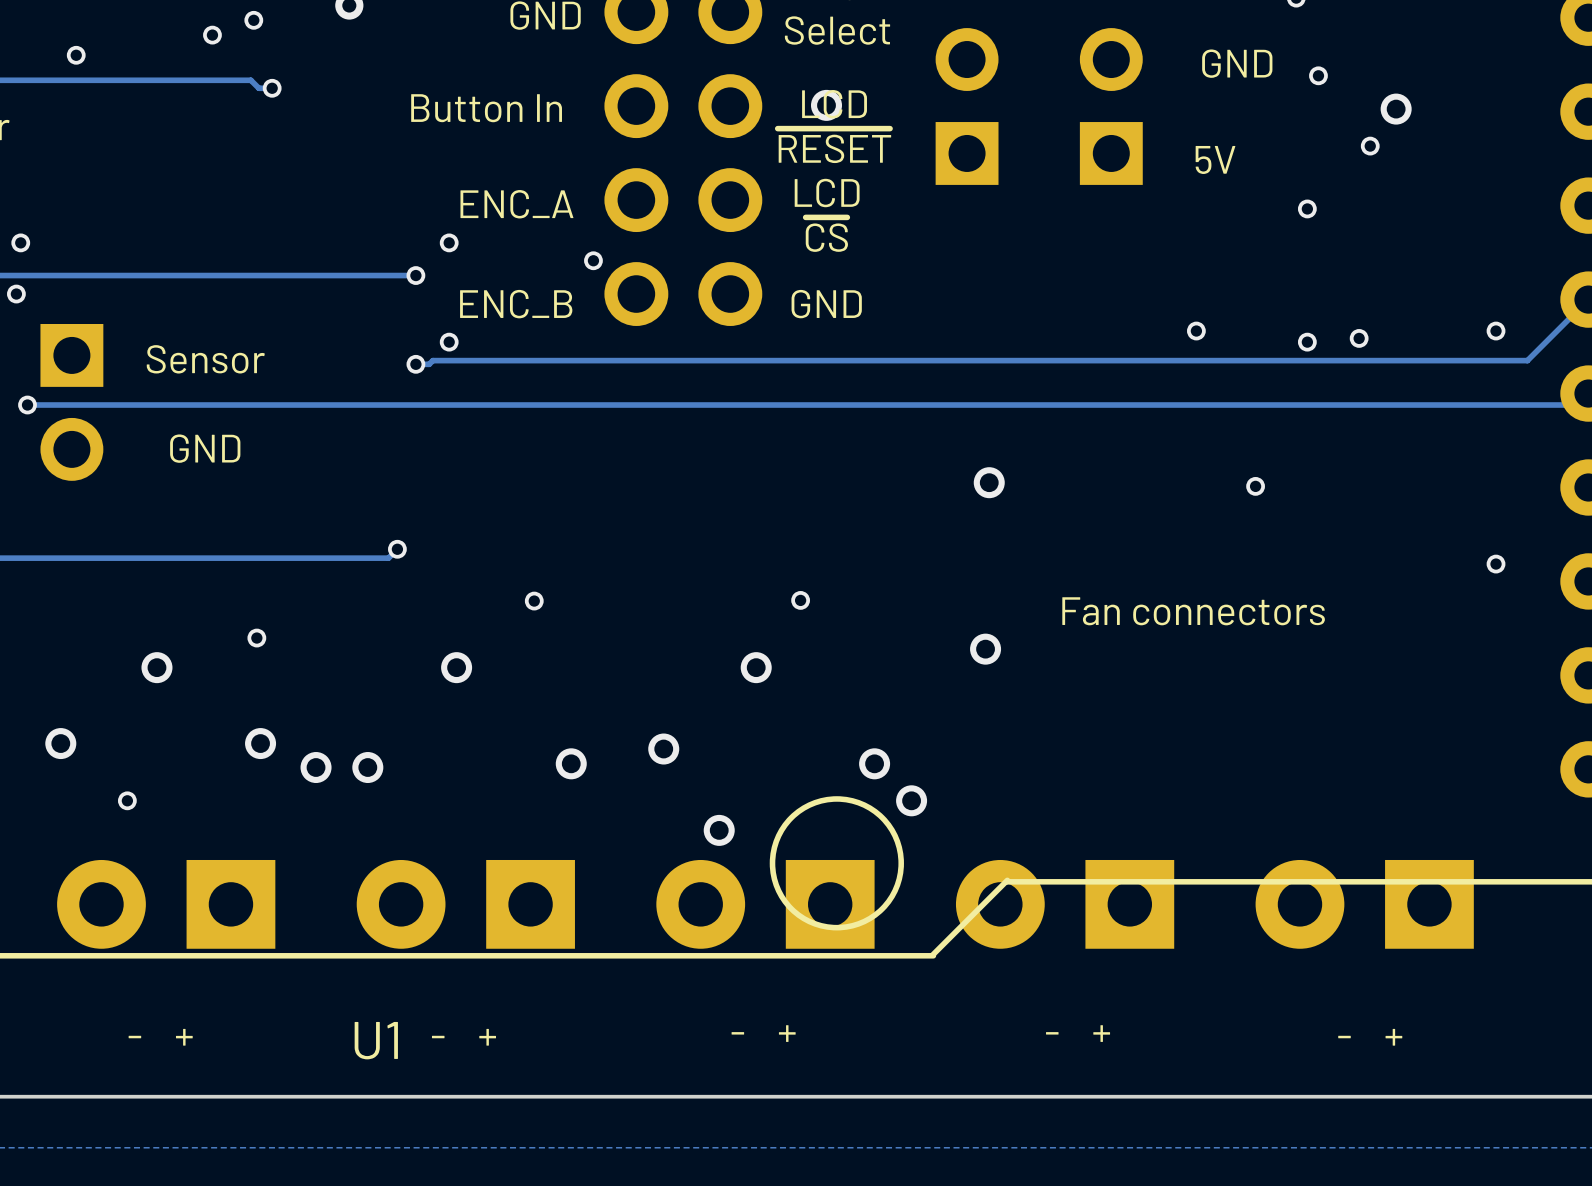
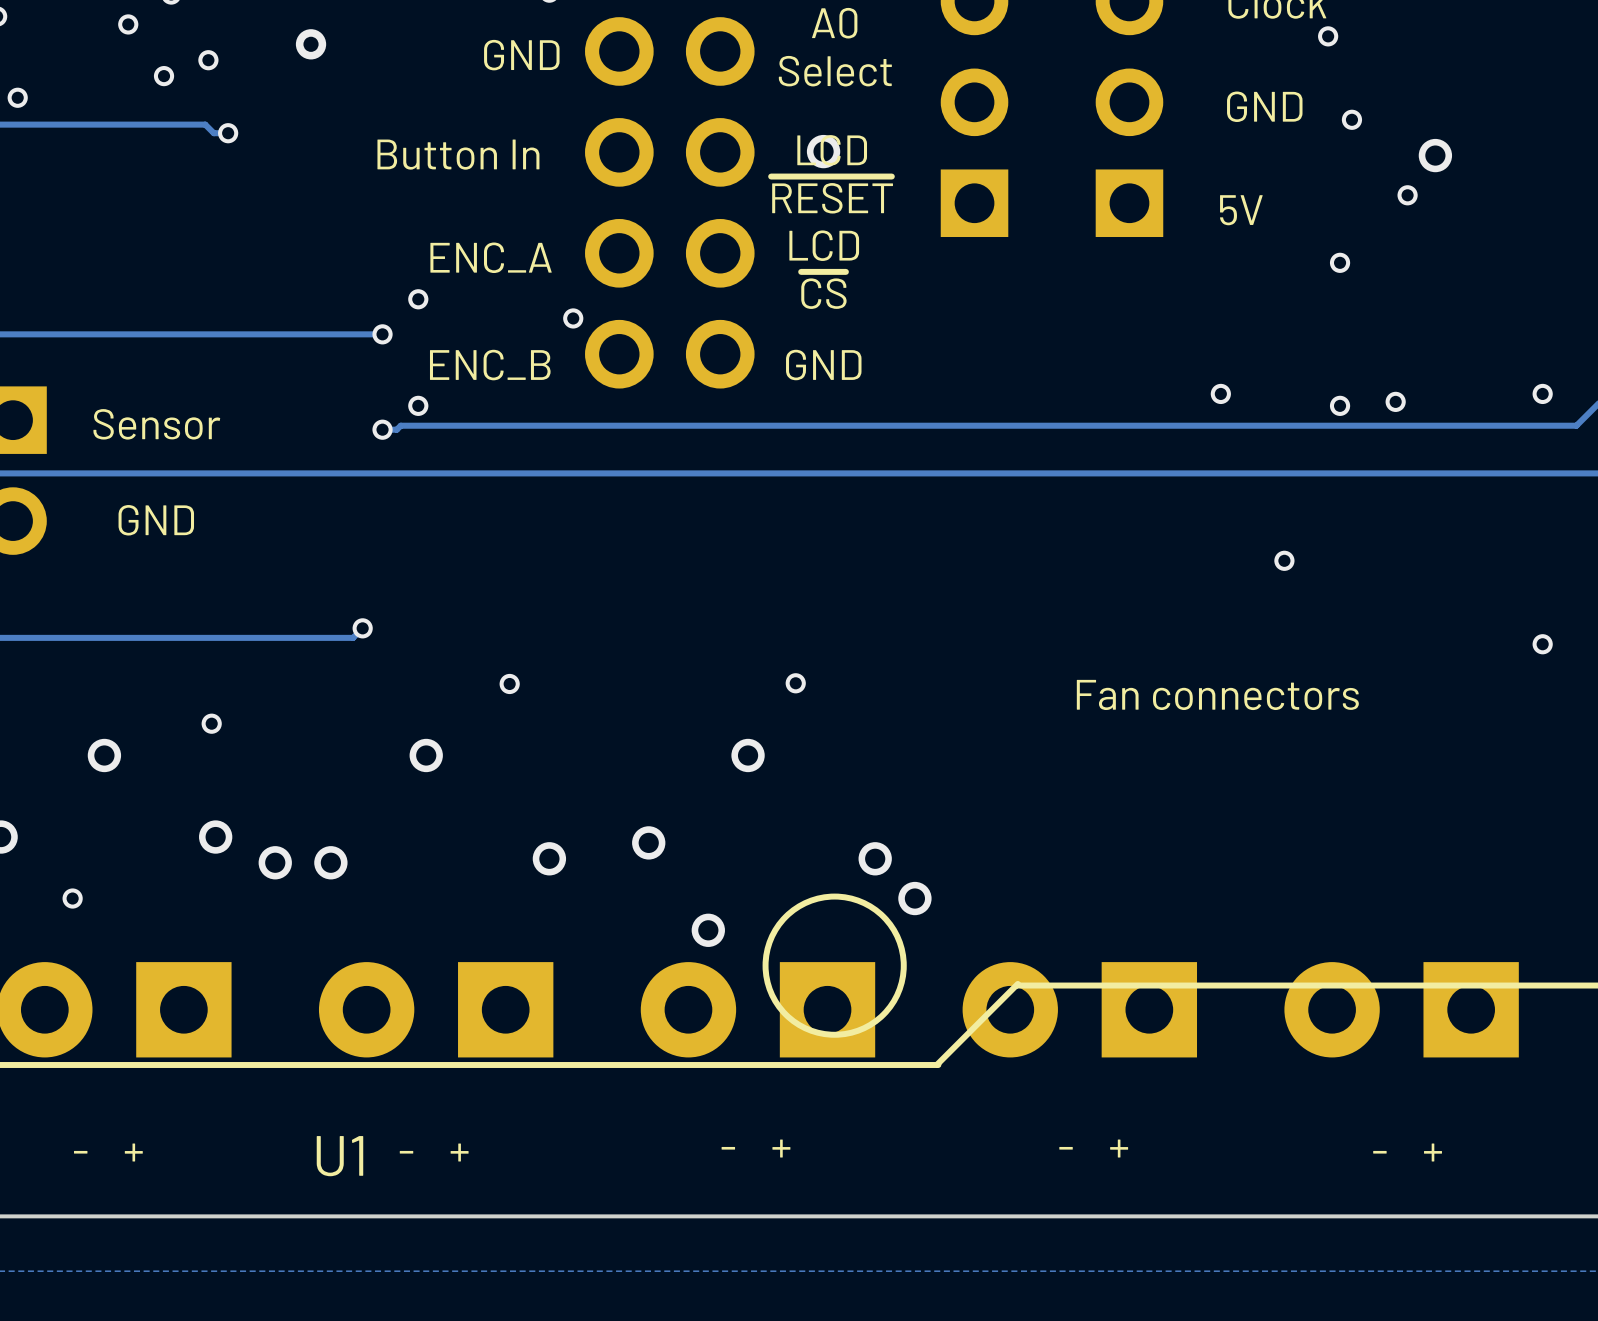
via: (989, 482) -> none
via: (985, 649) -> none

